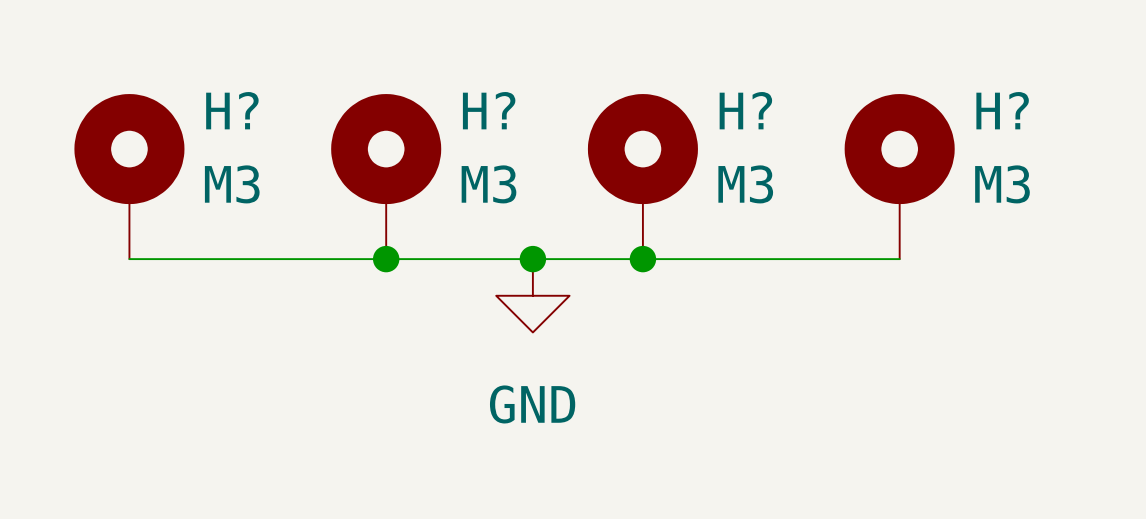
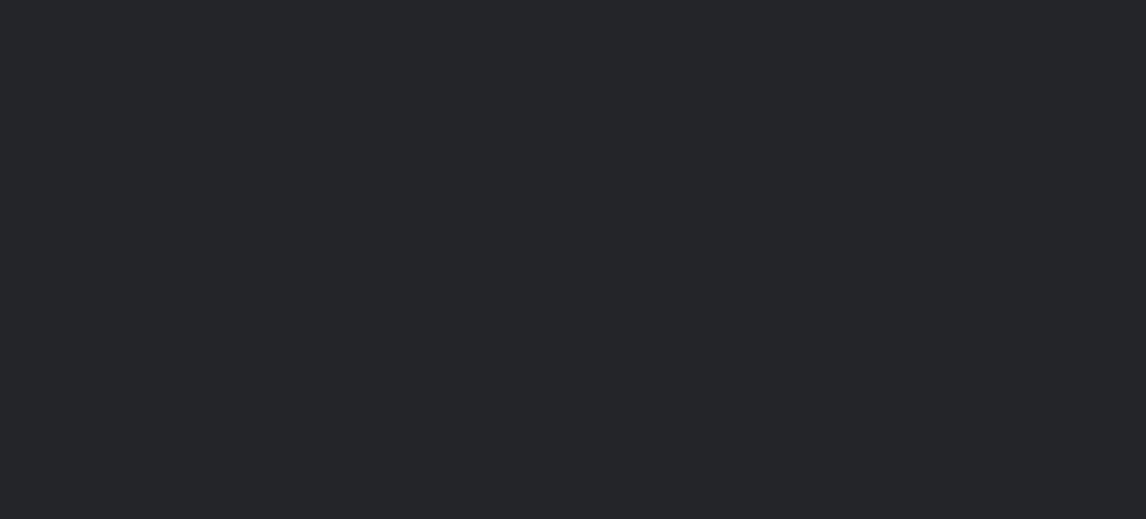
H?: M3 (129, 176) -> none
H?: M3 (386, 176) -> none
H?: M3 (642, 176) -> none
H?: M3 (899, 176) -> none
wire: (129, 259) (899, 259) -> none
junction: (386, 259) -> none
junction: (532, 259) -> none
junction: (642, 259) -> none
power symbol: GND (532, 295) -> none

